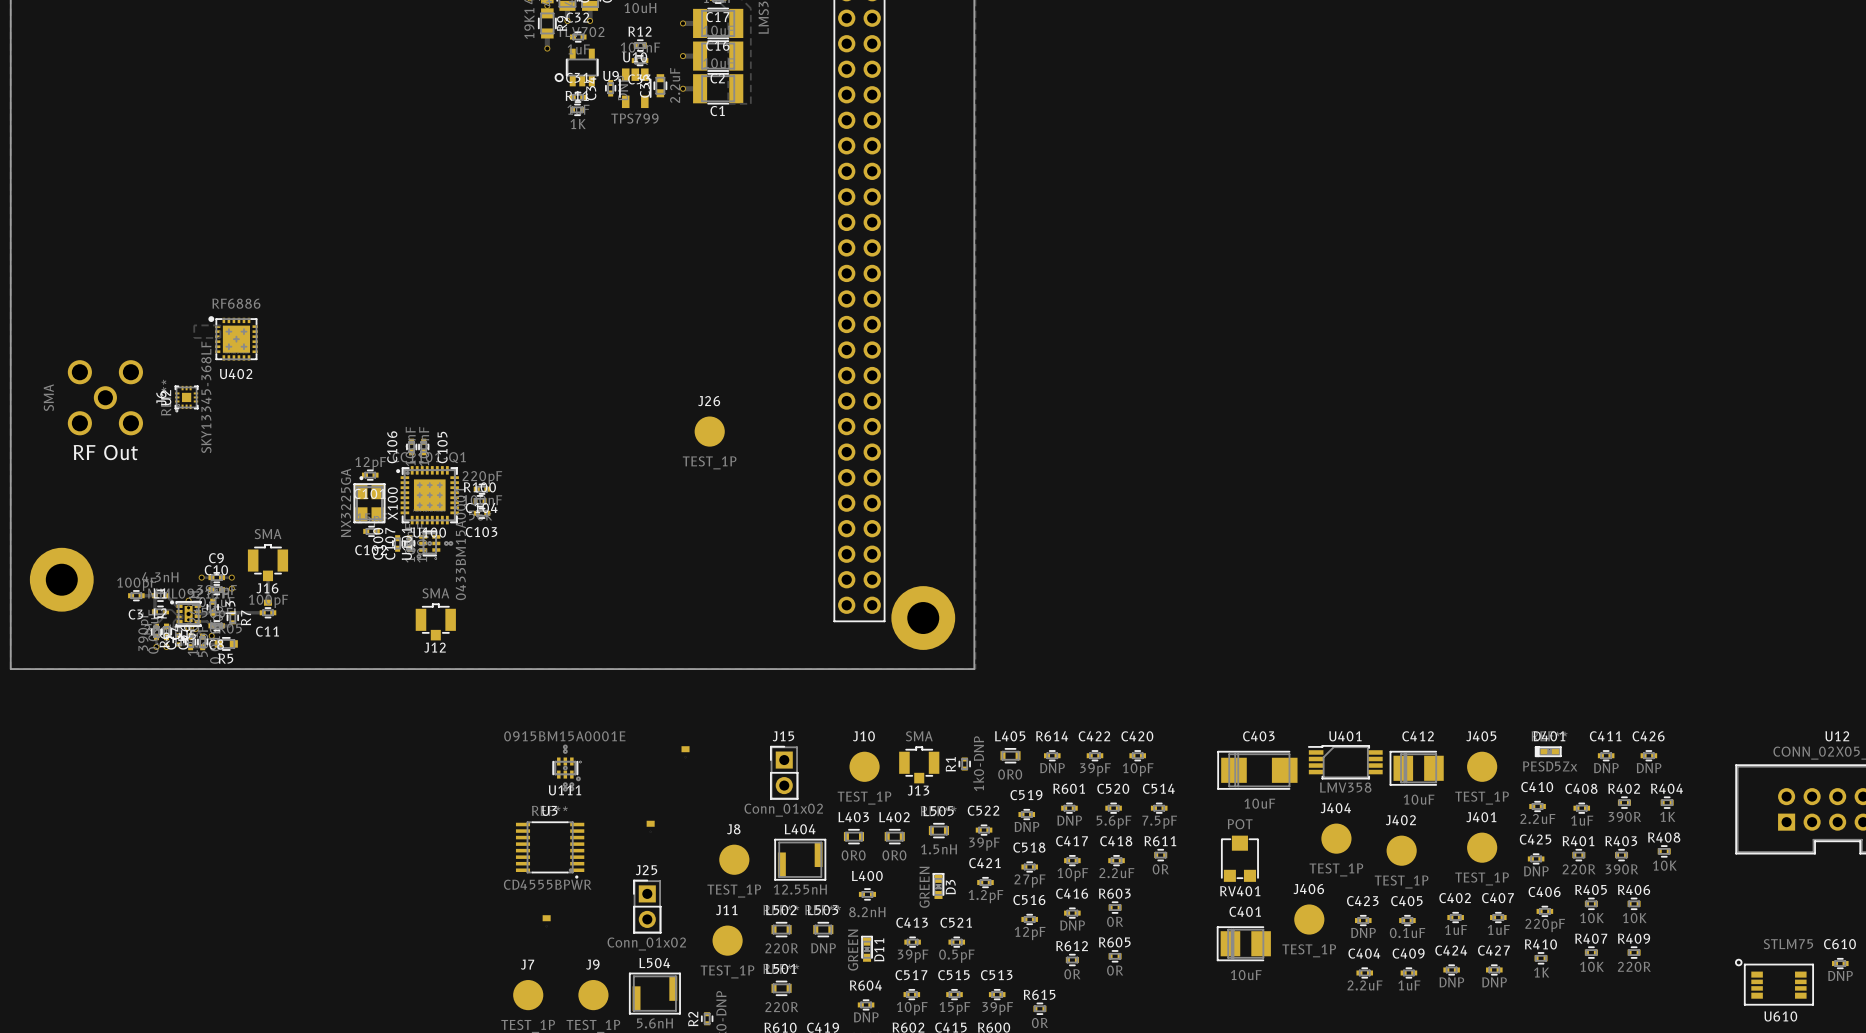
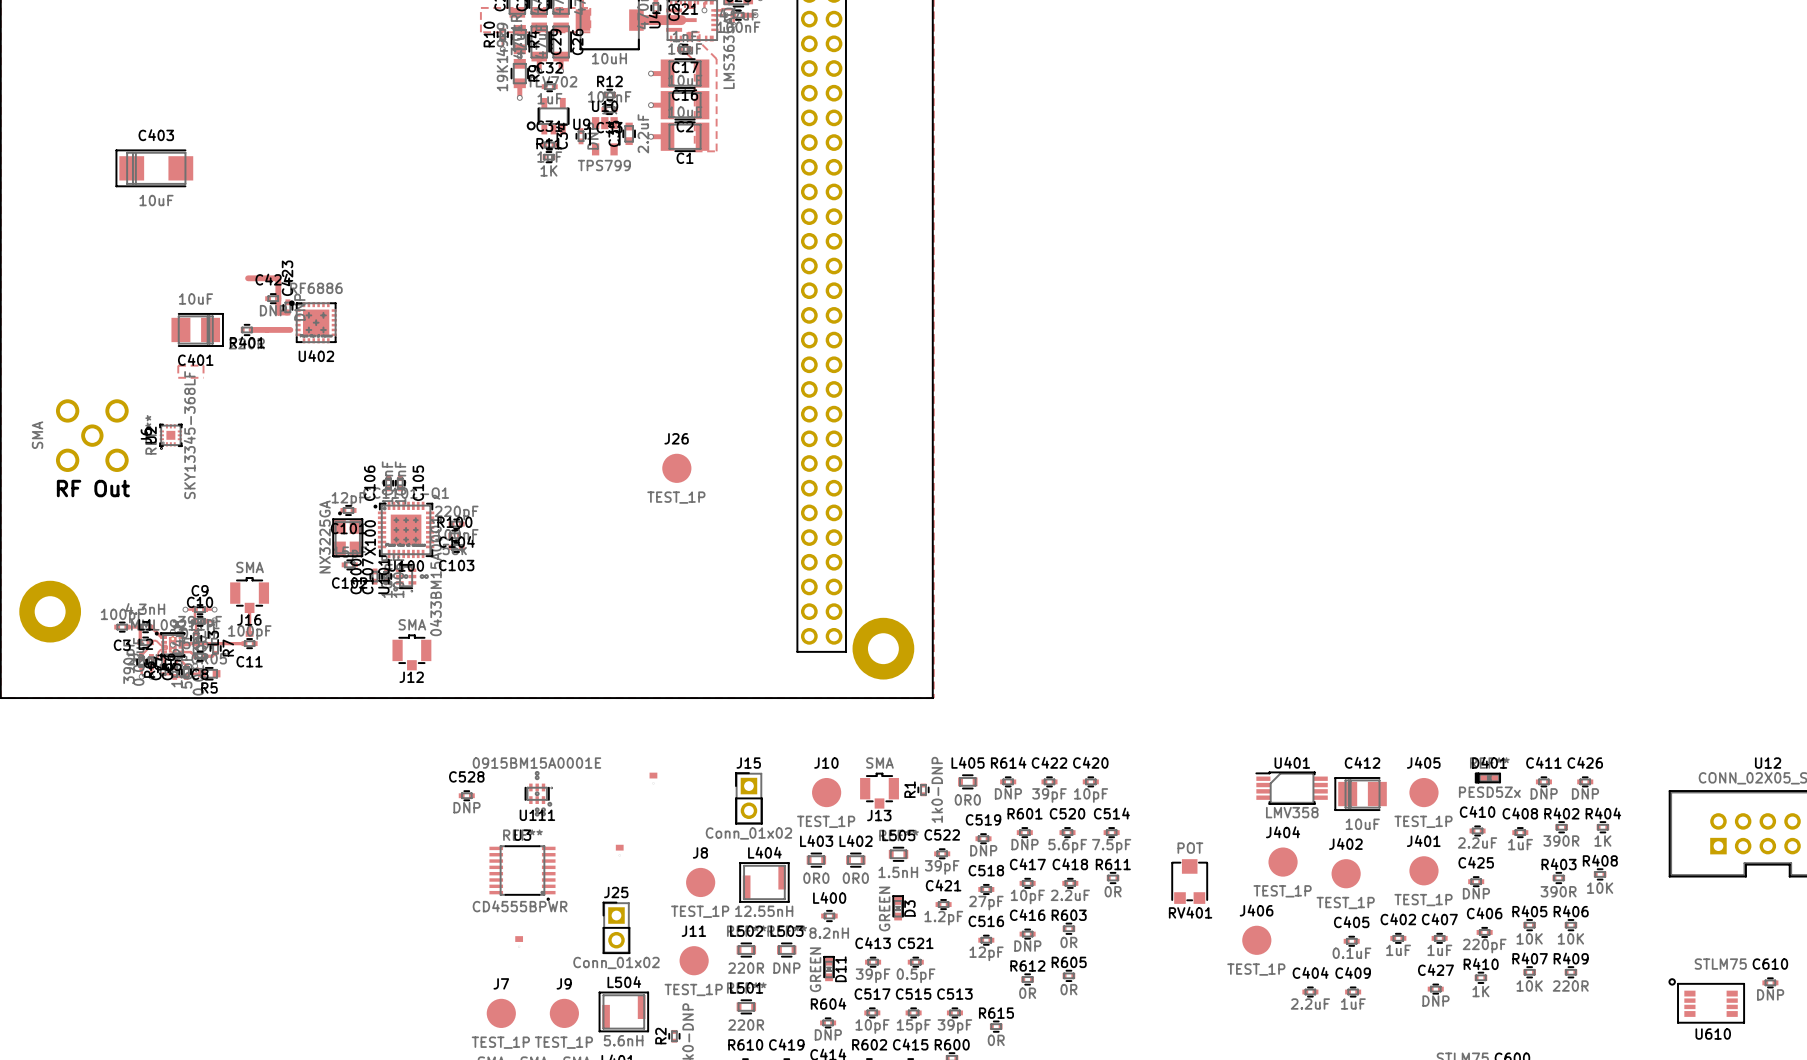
track: none -> (248, 278) (278, 278) (278, 312) (287, 312)
track: none -> (251, 329) (290, 329)
U402 position: (233, 338) -> (312, 321)
C528: none -> DNP (466, 795)
C403 position: (1257, 770) -> (154, 168)
R401 name position: R401 (1578, 841) -> R401 (247, 342)
R401 position: (1578, 855) -> (247, 329)
C423 rotation: 0° (1363, 920) -> 90° clockwise (287, 307)
C423 position: (1363, 920) -> (287, 307)
C401 rotation: 0° (1243, 943) -> 180° (197, 329)
C401 position: (1243, 943) -> (197, 329)
C424 position: (1451, 969) -> (273, 298)

